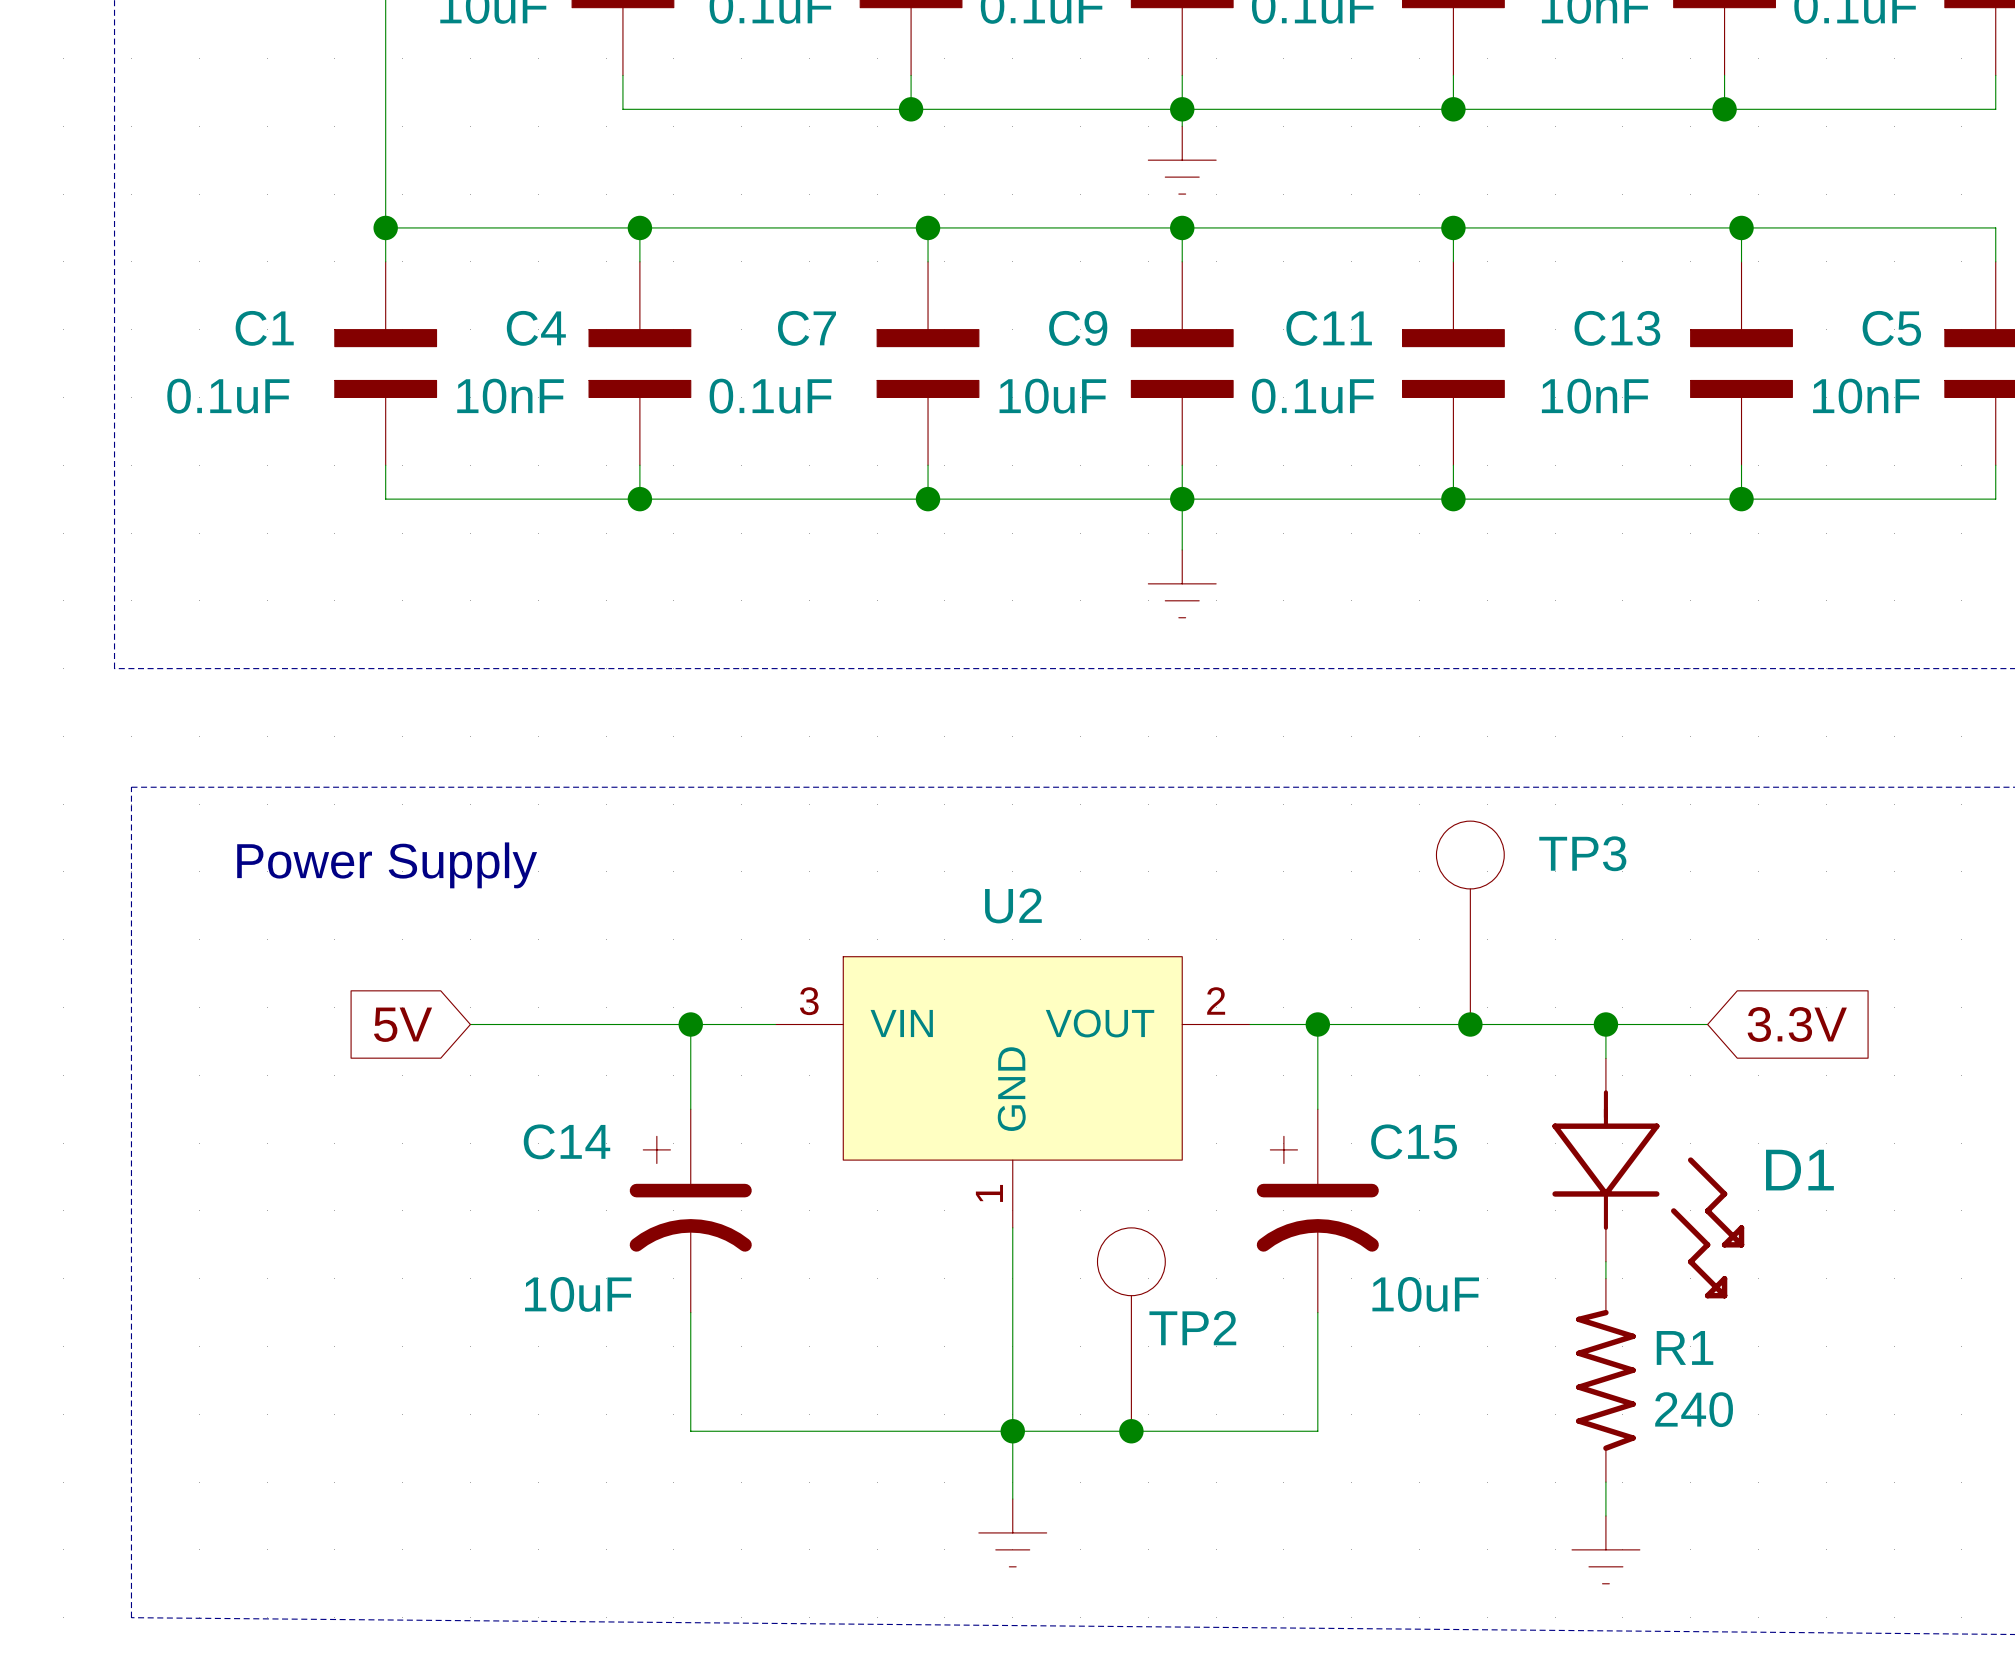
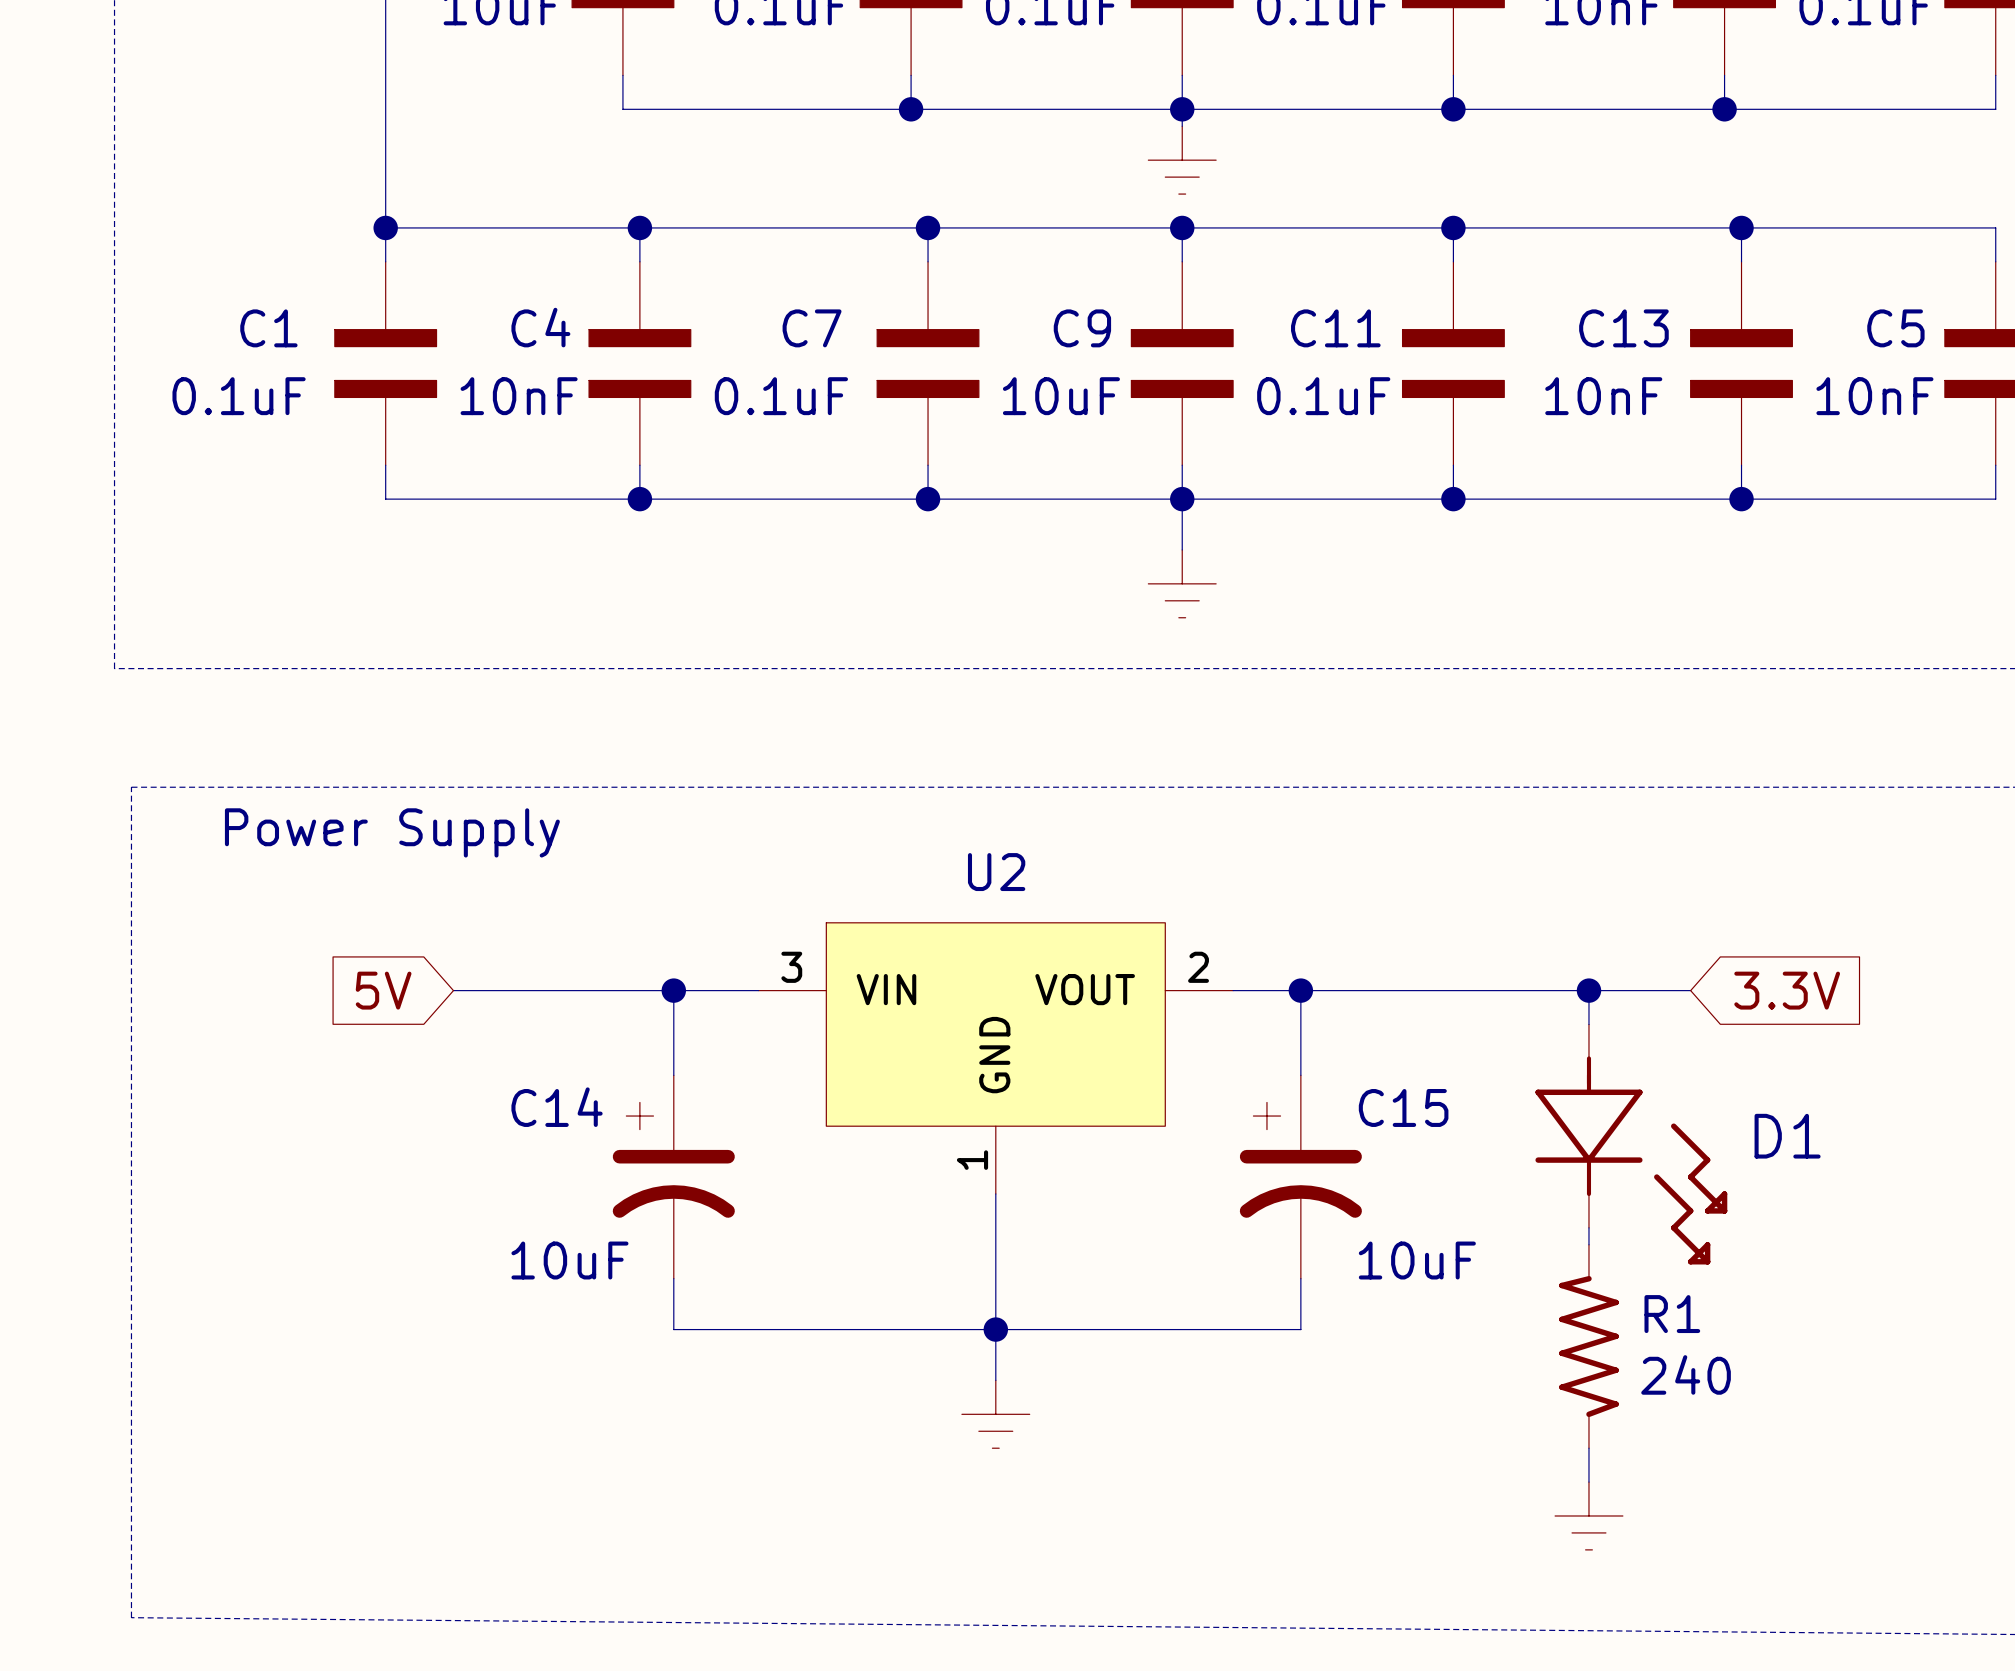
text position: Power Supply (387, 865) -> Power Supply (392, 832)
TP3: (1470, 922) -> none
global label position: 5V (403, 1024) -> 5V (383, 990)
wire: (470, 1024) (775, 1024) -> (453, 990) (758, 990)
wire: (690, 1024) (690, 1109) -> (673, 990) (673, 1075)
junction position: (690, 1024) -> (673, 990)
wire: (1250, 1024) (1707, 1024) -> (1233, 990) (1690, 990)
wire: (1317, 1024) (1317, 1109) -> (1300, 990) (1300, 1075)
junction position: (1317, 1024) -> (1300, 990)
junction: (1470, 1024) -> none
wire: (1605, 1024) (1605, 1058) -> (1588, 990) (1588, 1024)
junction position: (1605, 1024) -> (1588, 990)
global label position: 3.3V (1797, 1024) -> 3.3V (1787, 990)
U2 position: (1012, 1092) -> (995, 1058)
D1 position: (1648, 1178) -> (1631, 1144)
wire: none -> (995, 1193) (995, 1380)
C14 position: (690, 1210) -> (673, 1177)
C15 position: (1317, 1210) -> (1300, 1177)
wire: (1012, 1227) (1012, 1499) -> none
wire: (1605, 1261) (1605, 1278) -> (1588, 1227) (1588, 1244)
wire: none -> (673, 1278) (673, 1329) (1300, 1329) (1300, 1278)
wire: (690, 1312) (690, 1431) (1317, 1431) (1317, 1312) -> none
junction: none -> (995, 1329)
TP2: (1131, 1329) -> none
R1 position: (1605, 1380) -> (1588, 1346)
junction: (1012, 1431) -> none
junction: (1131, 1431) -> none
wire: (1605, 1482) (1605, 1515) -> (1588, 1448) (1588, 1482)
power symbol position: (1012, 1532) -> (995, 1414)
power symbol position: (1605, 1549) -> (1588, 1515)

